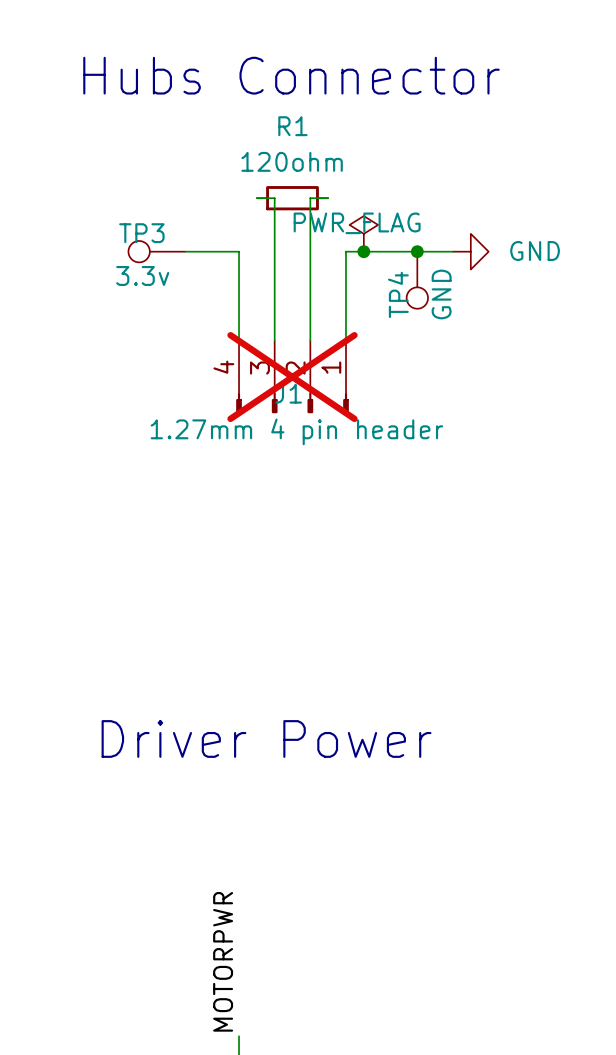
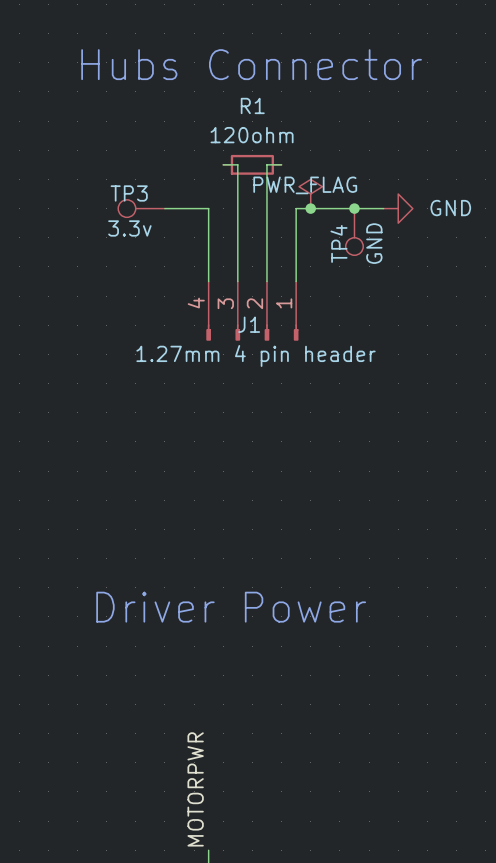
J1 do-not-place cross: (292, 377) -> none

